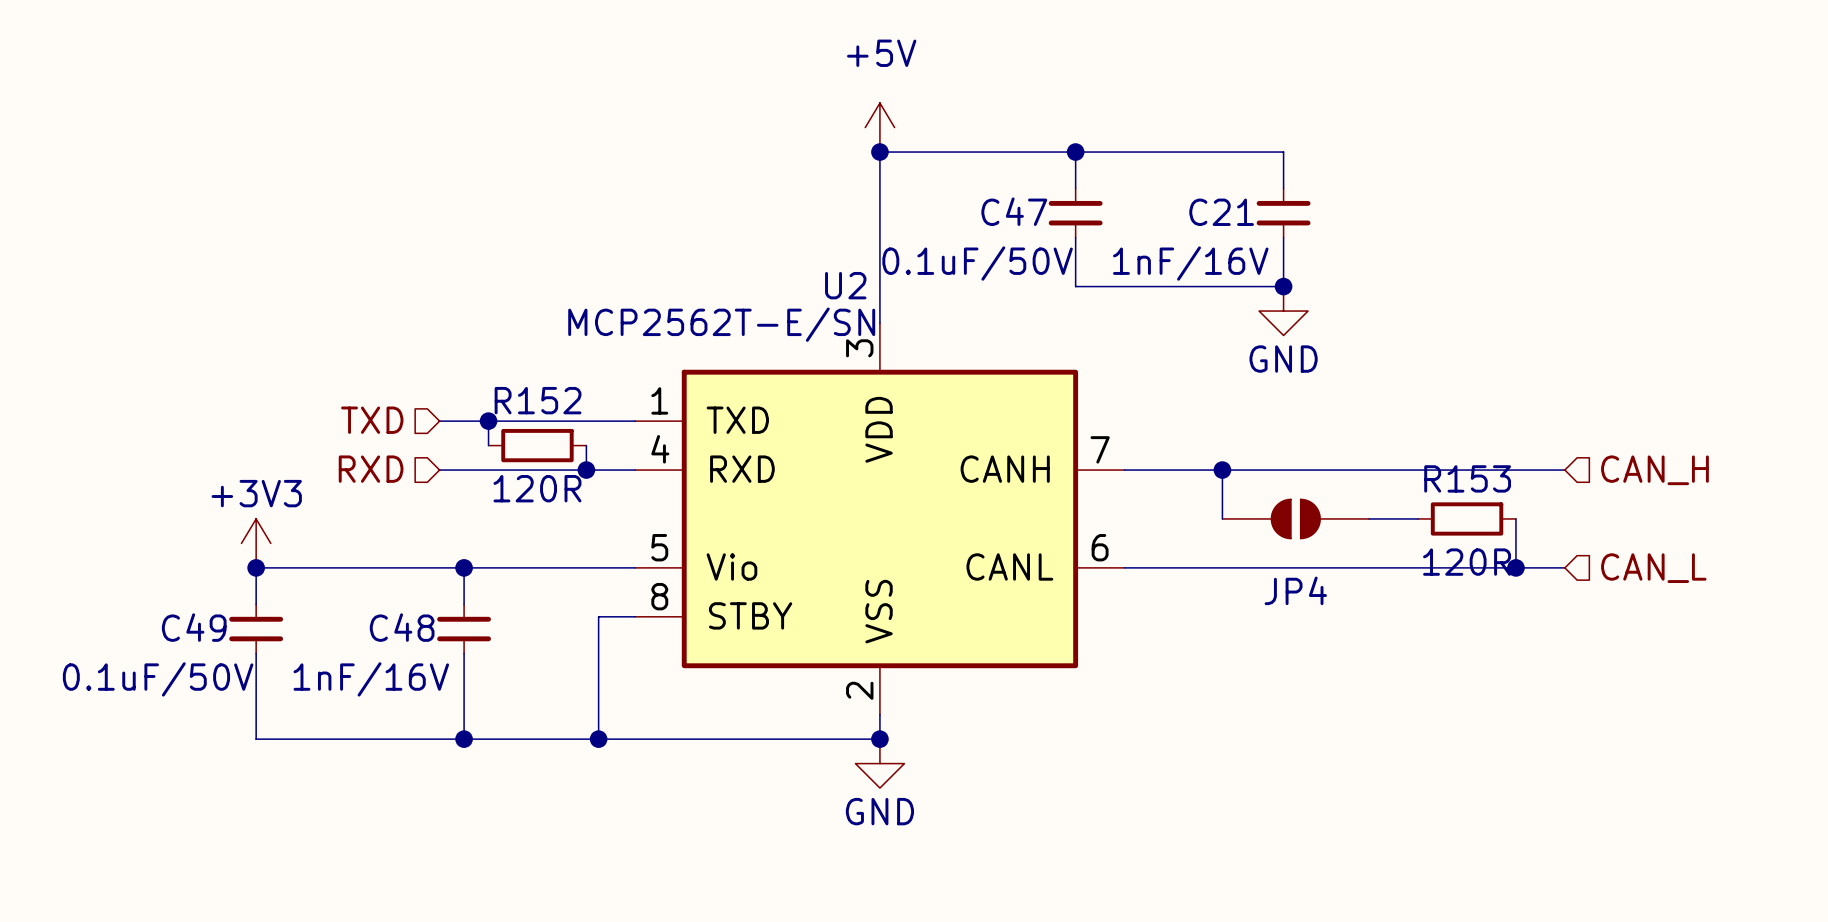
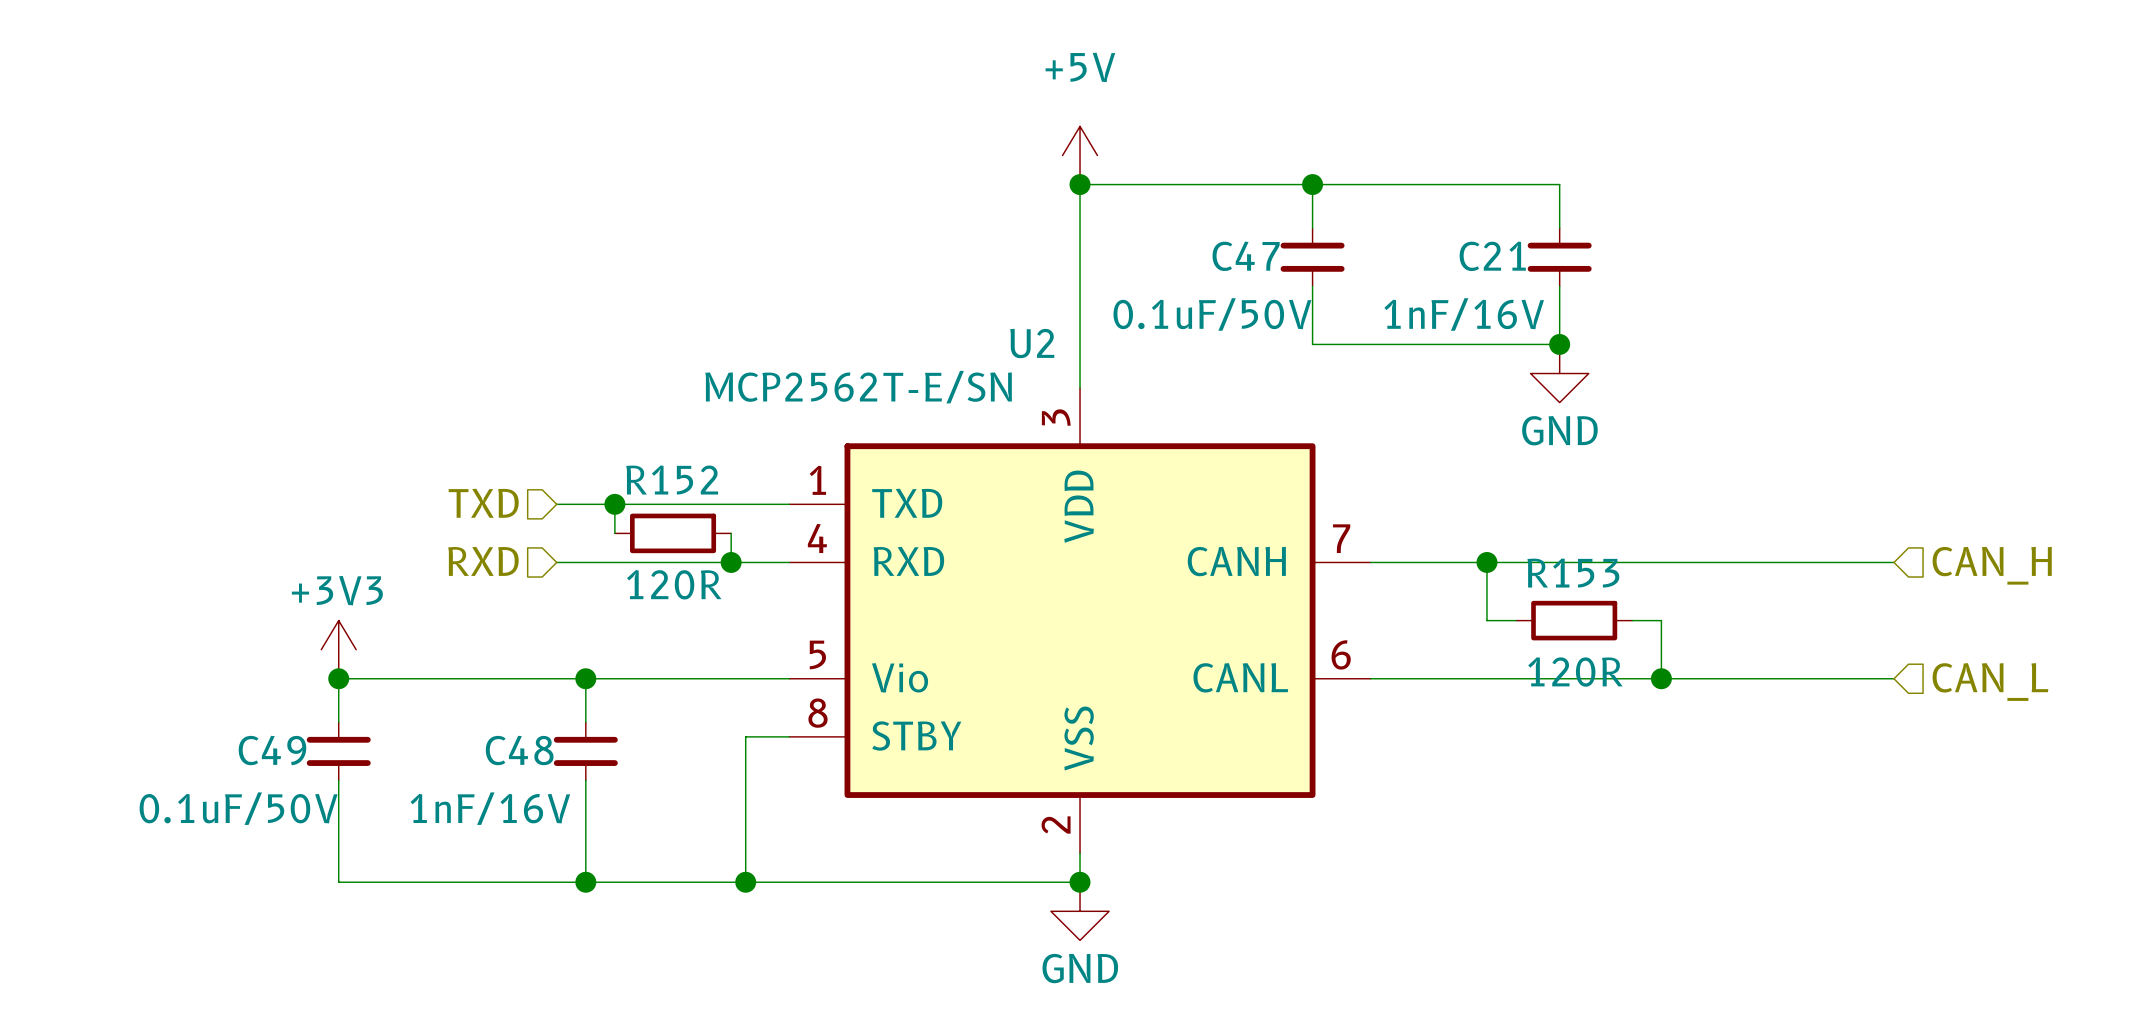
JP4: (1295, 518) -> none
wire: none -> (1632, 620) (1661, 620) (1661, 678)
wire: (1369, 518) (1418, 518) -> none
R153 position: (1467, 518) -> (1574, 620)
wire: (1515, 518) (1515, 567) -> none
junction: none -> (1661, 678)
junction: (1515, 567) -> none

